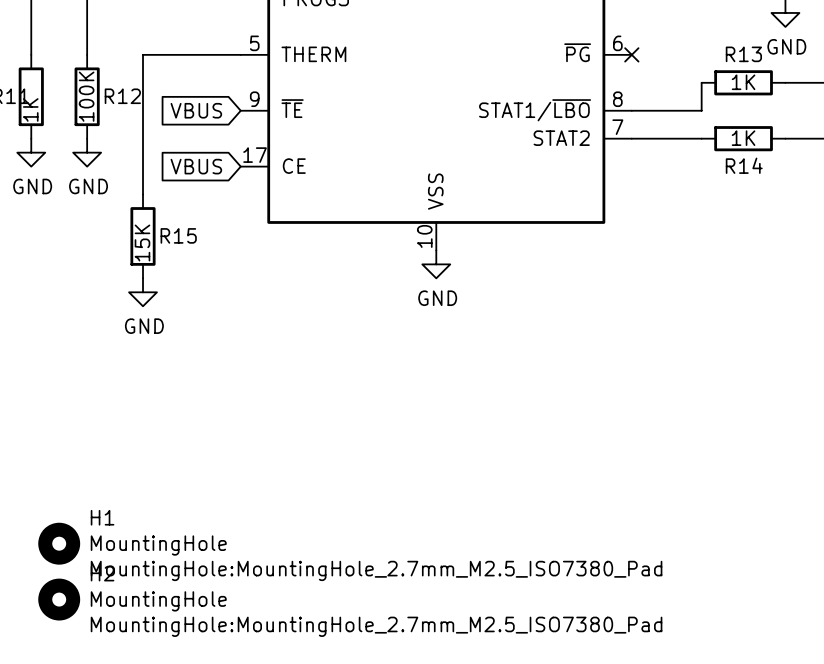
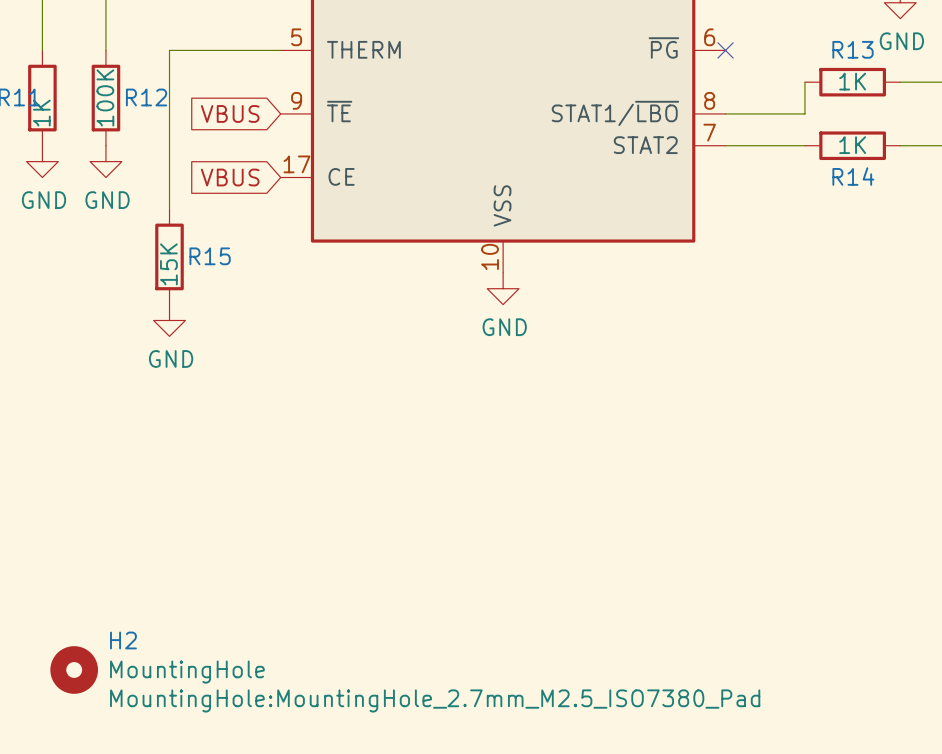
H1: MountingHole (59, 543) -> none

